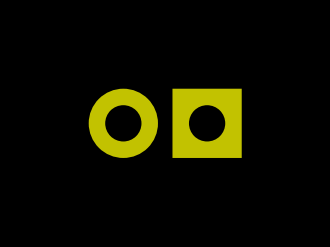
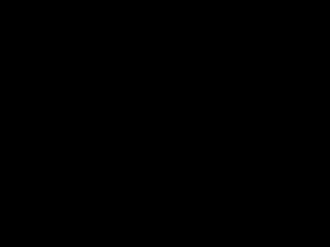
part: (165, 123) -> none

